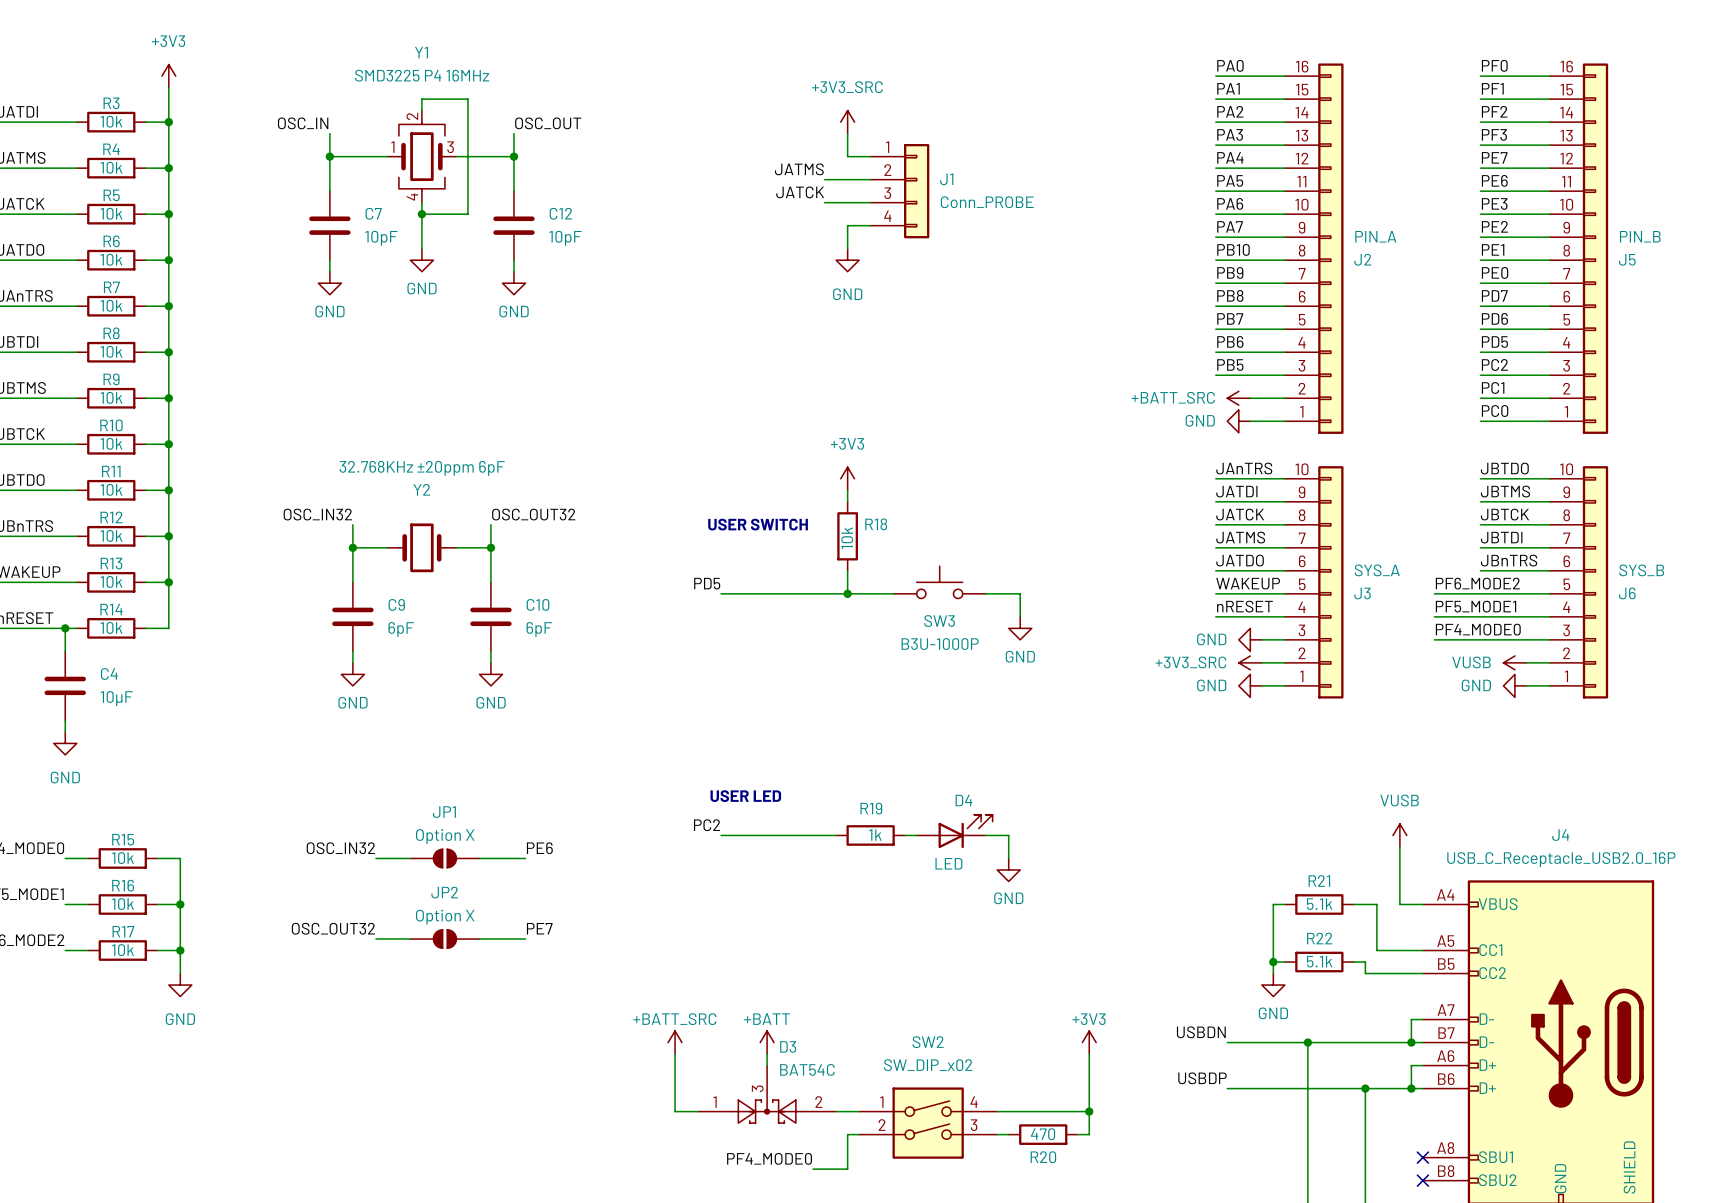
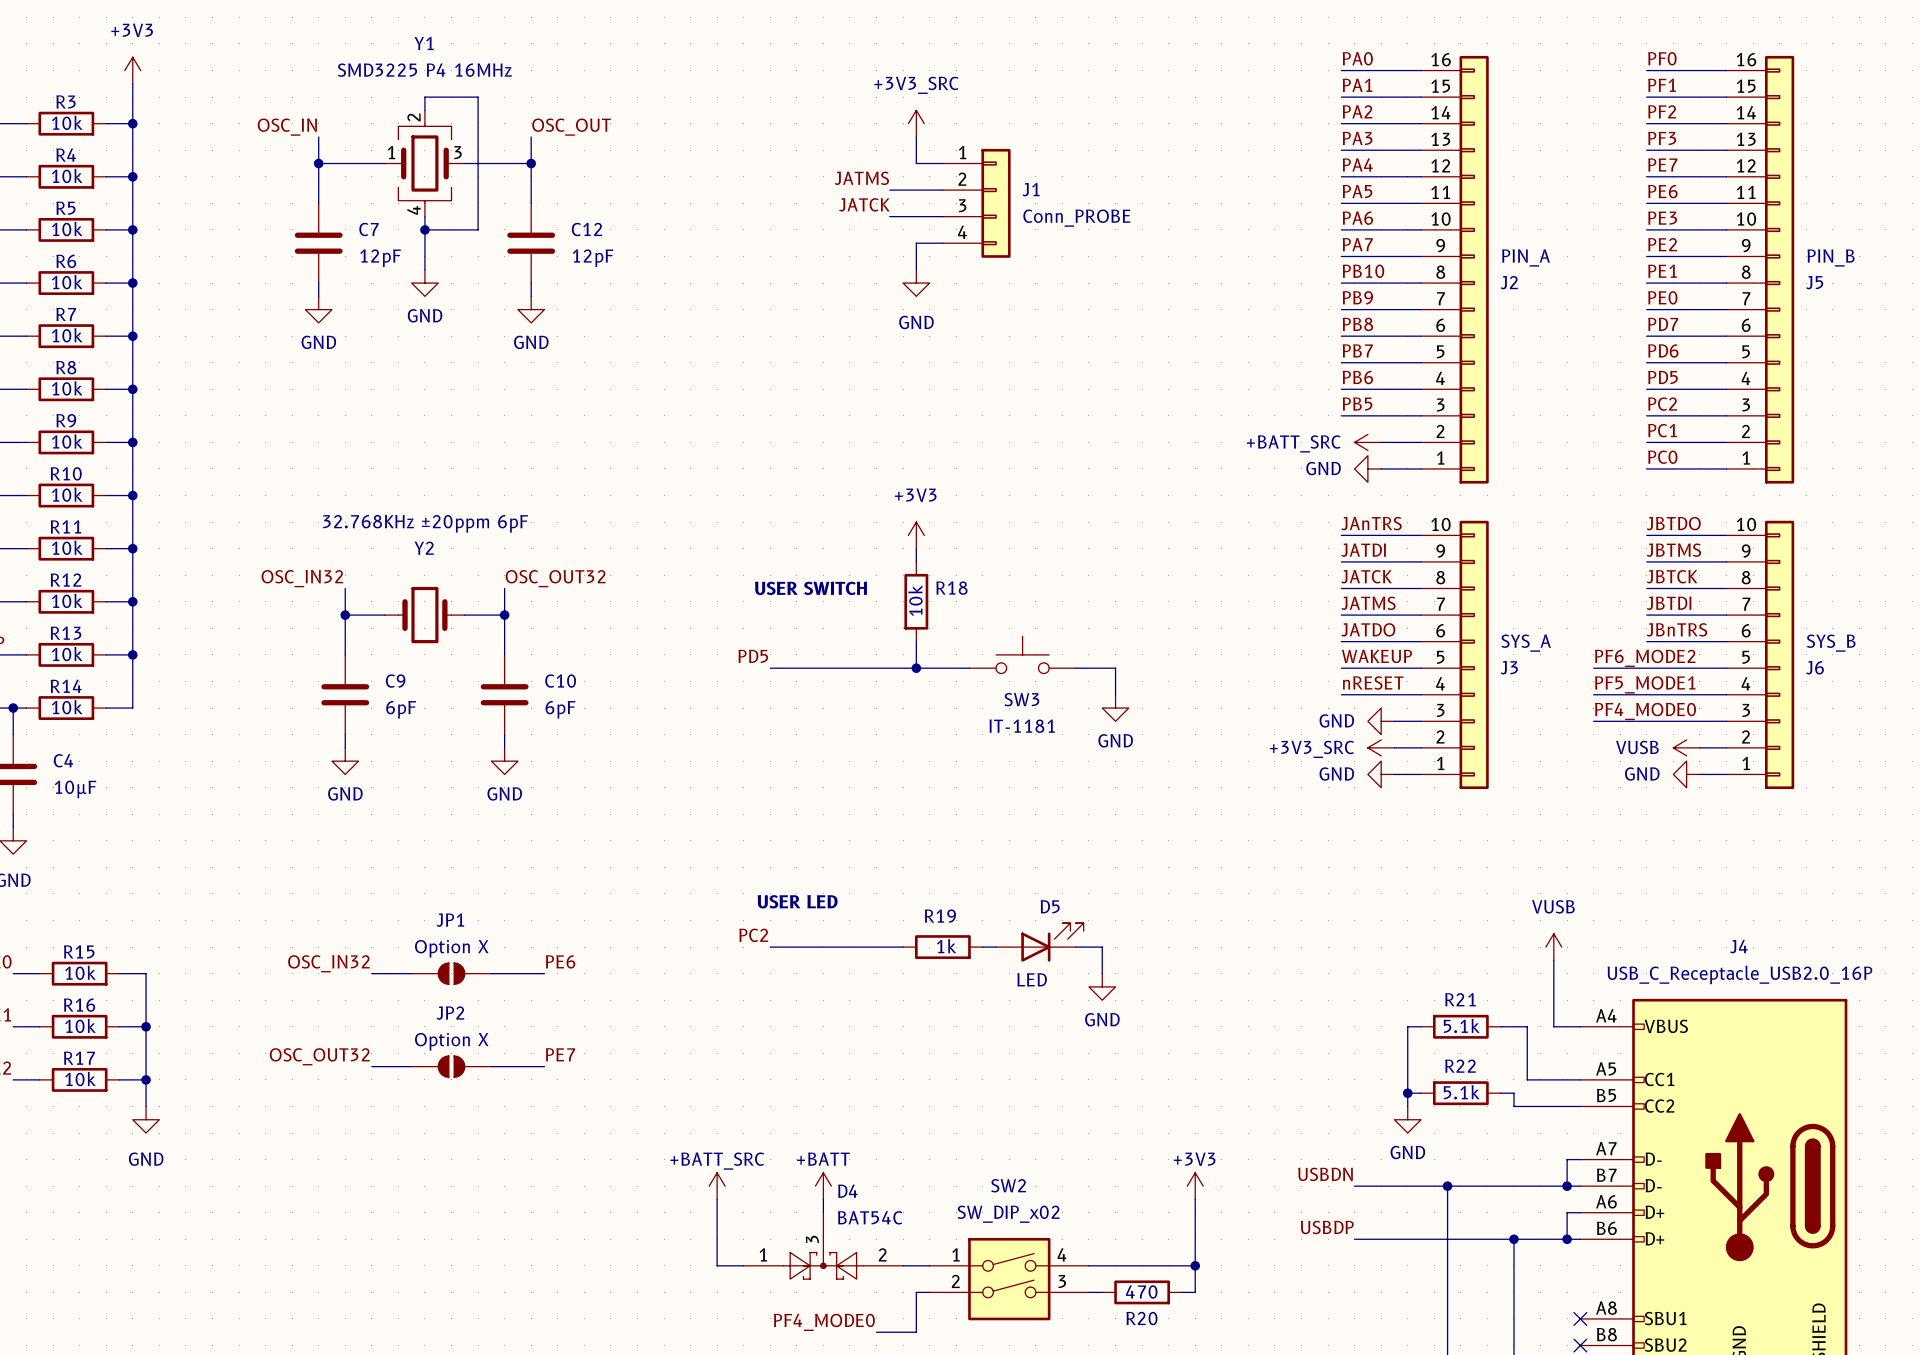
C7 value: 10pF (381, 238) -> 12pF (380, 258)
C12 value: 10pF (565, 238) -> 12pF (593, 258)
SW3 value: B3U-1000P (940, 644) -> IT-1181 (1022, 726)
D4 name: D4 (963, 800) -> D5 (1050, 906)
D3 name: D3 (788, 1046) -> D4 (847, 1191)

